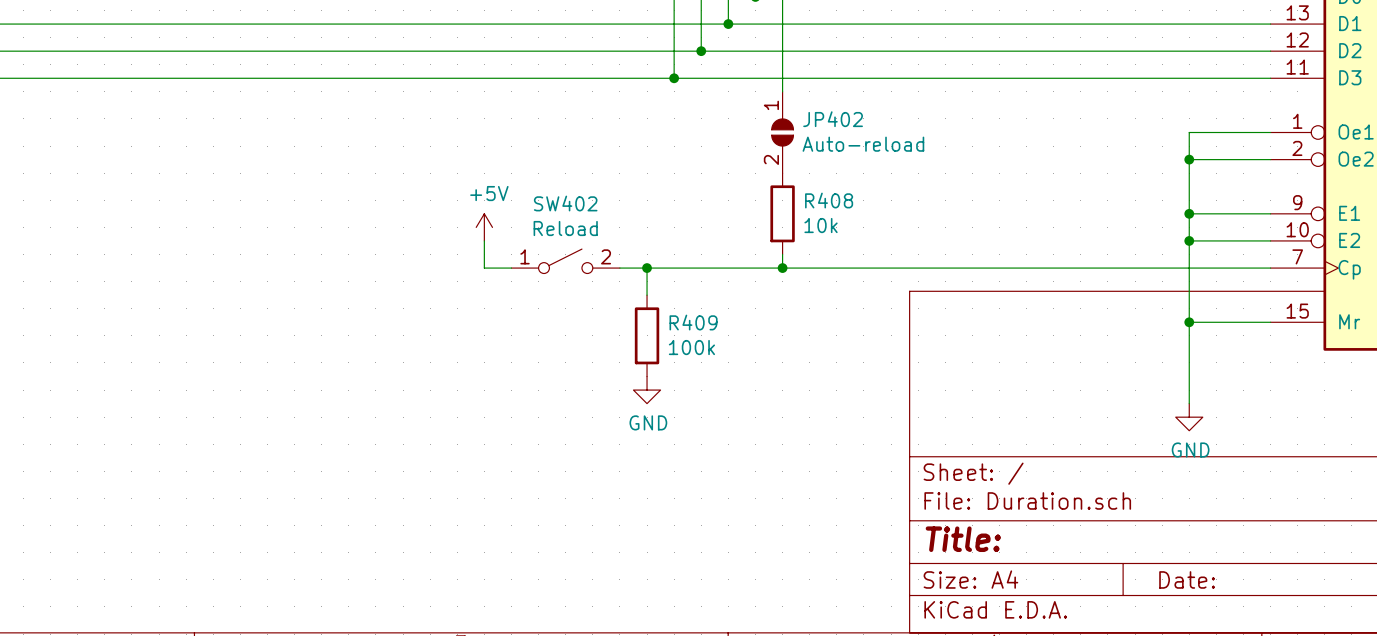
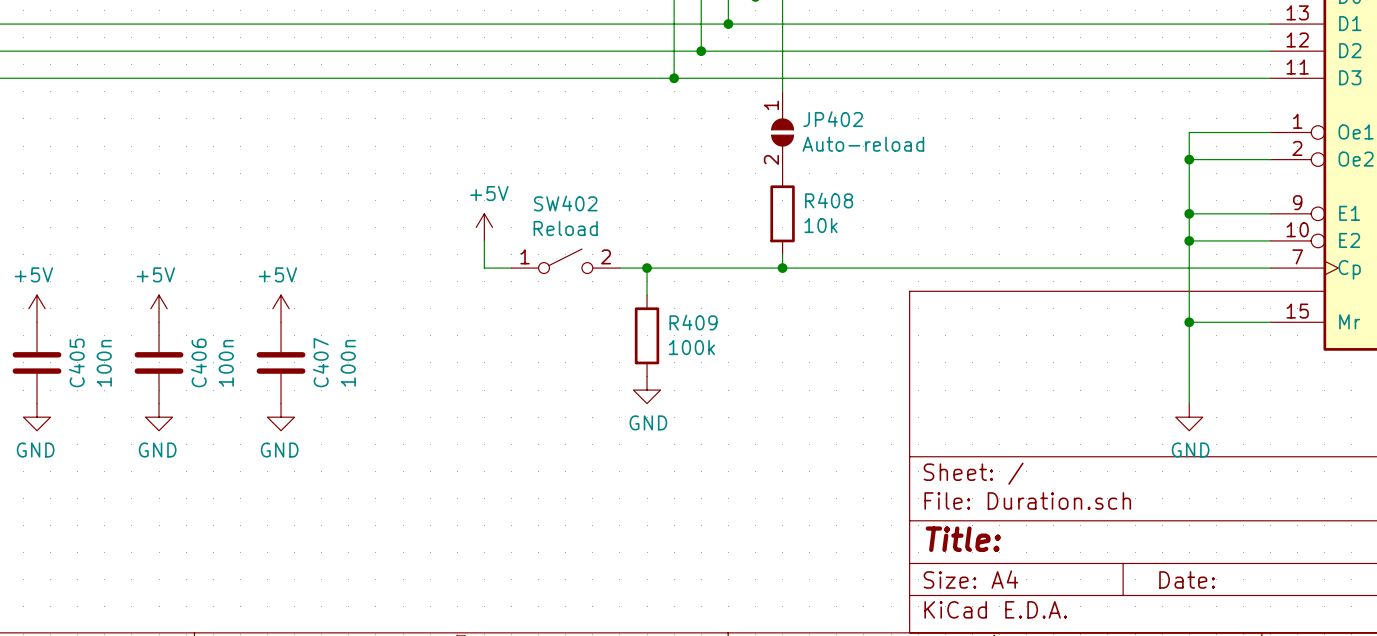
power symbol: none -> +5V (37, 308)
power symbol: none -> +5V (159, 308)
power symbol: none -> +5V (281, 308)
C405: none -> 100n (37, 362)
C406: none -> 100n (159, 362)
C407: none -> 100n (281, 362)
power symbol: none -> GND (37, 417)
power symbol: none -> GND (159, 417)
power symbol: none -> GND (281, 417)

